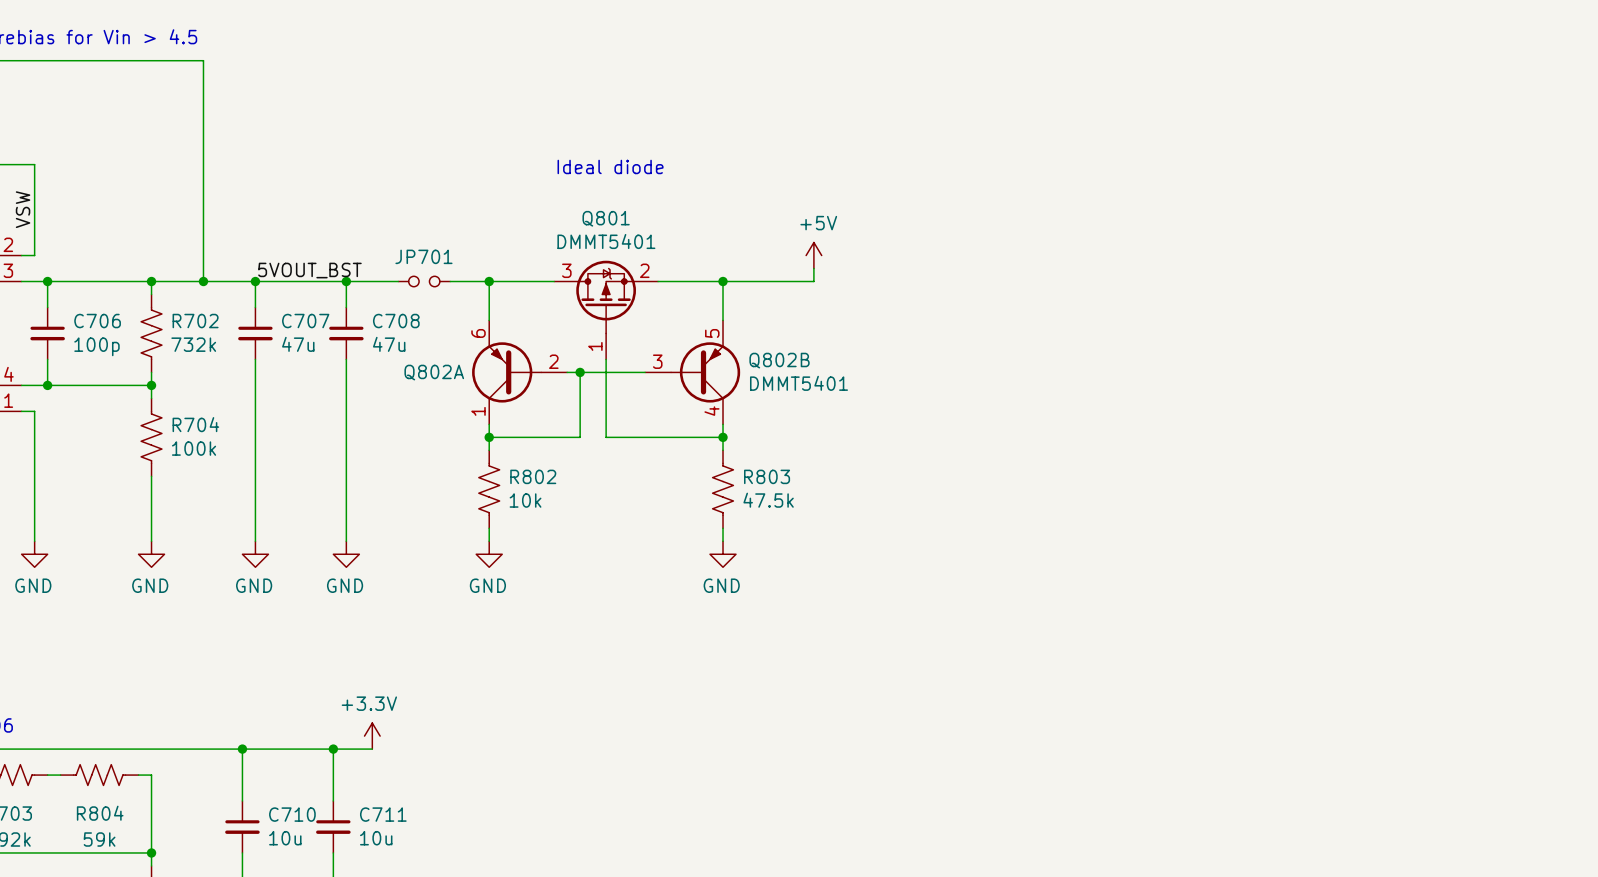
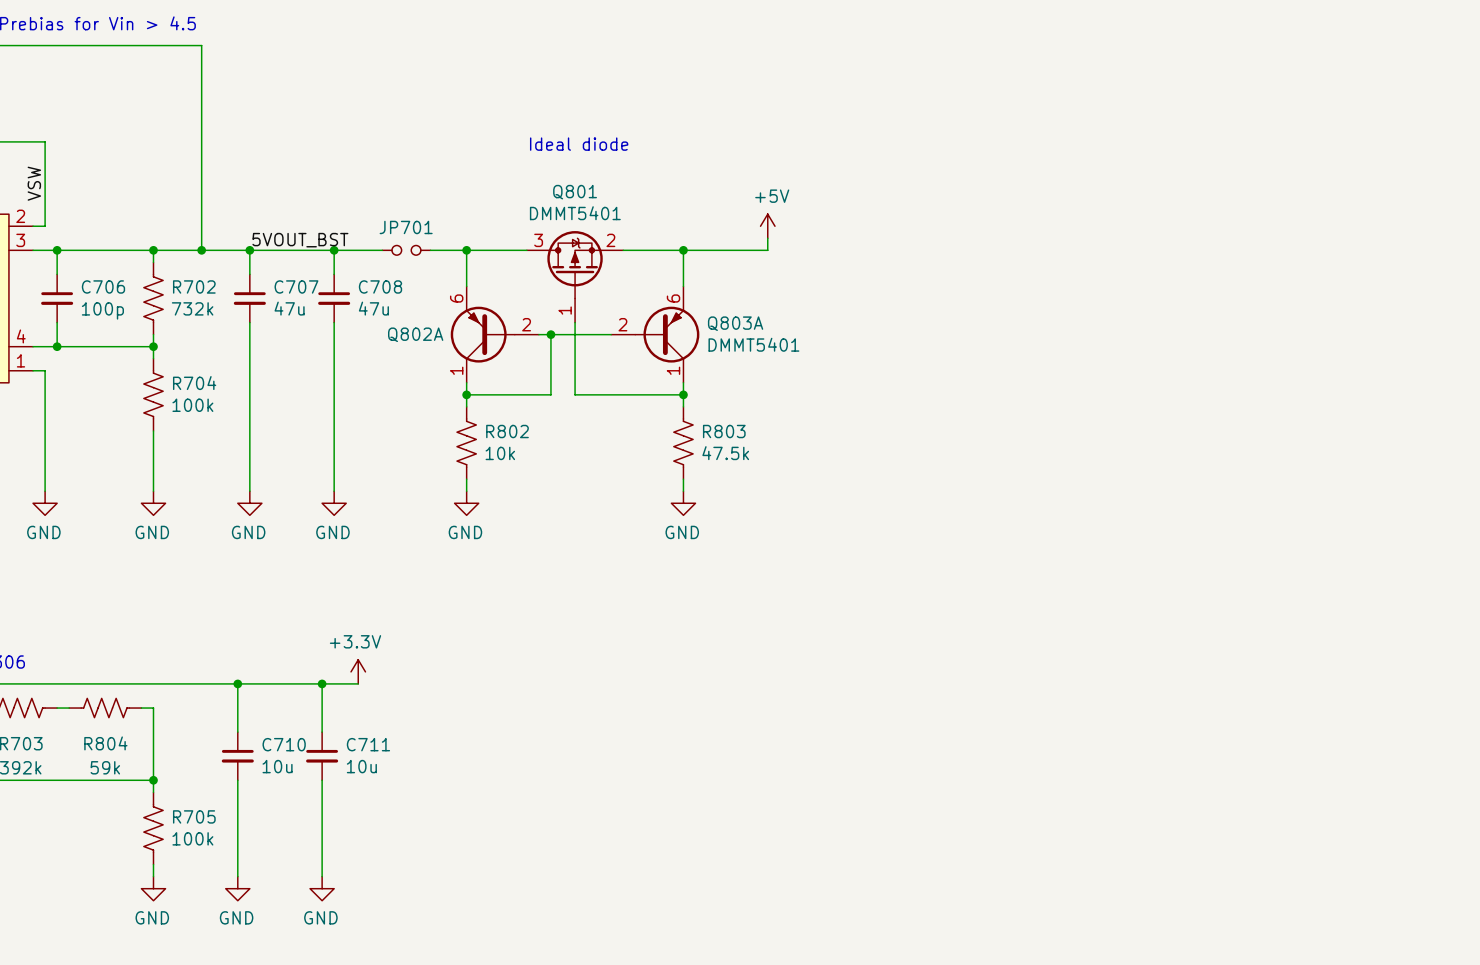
Q802B pin number: 5 (712, 333) -> 6 (673, 298)
Q802B name: Q802B (779, 360) -> Q803A (735, 323)
Q802B pin number: 3 (657, 361) -> 2 (622, 324)
Q802B pin number: 4 (711, 411) -> 1 (673, 370)

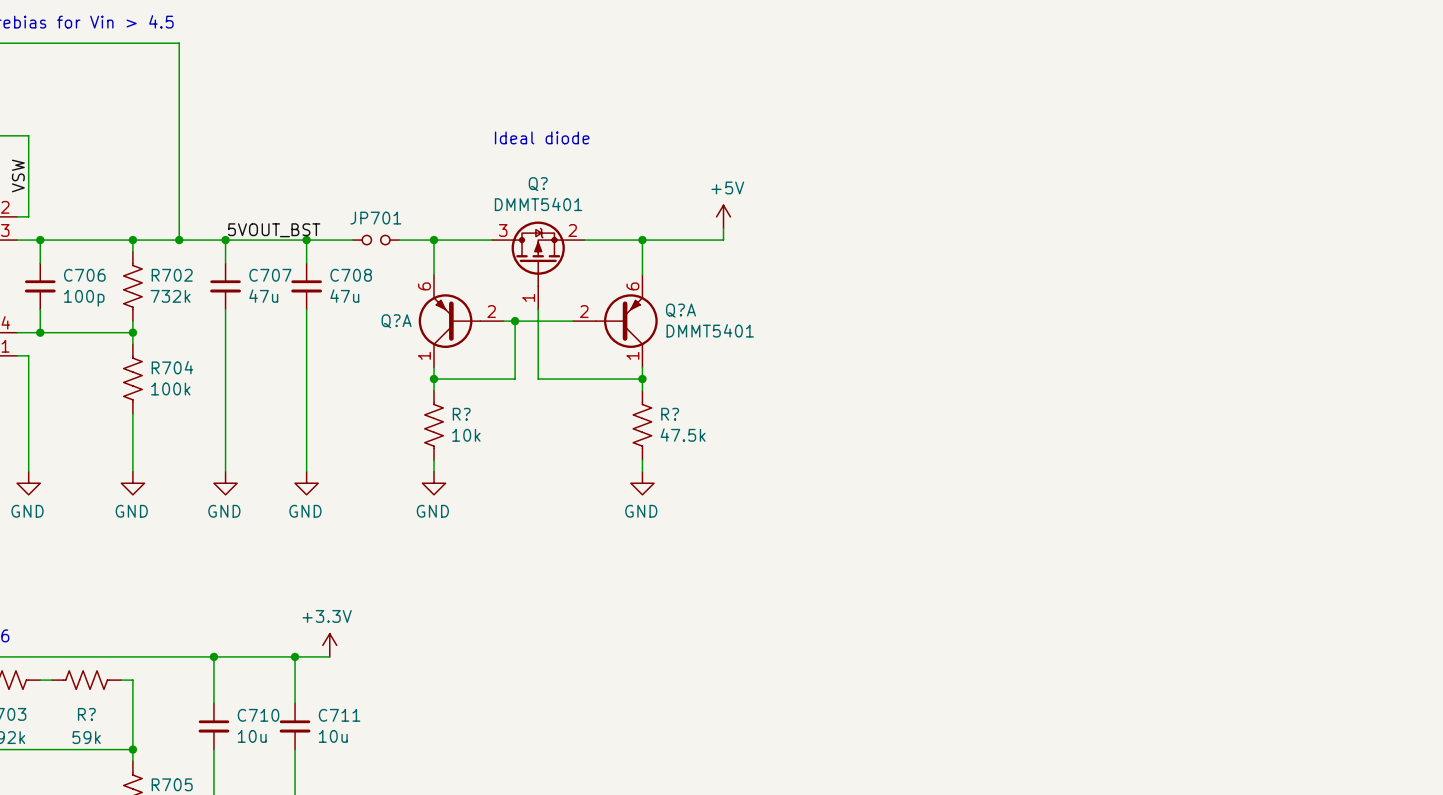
Q801 name: Q801 (575, 192) -> Q? (538, 184)
Q803A name: Q803A (735, 323) -> Q?A (680, 310)
Q802A name: Q802A (415, 334) -> Q?A (396, 321)
R802 name: R802 (507, 431) -> R? (461, 414)
R803 name: R803 (724, 431) -> R? (670, 414)
R804 name: R804 (105, 743) -> R? (86, 714)

